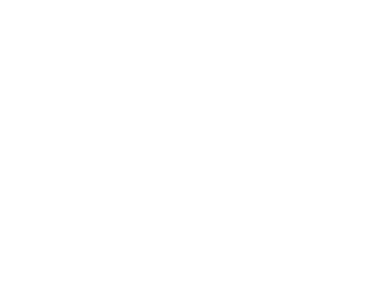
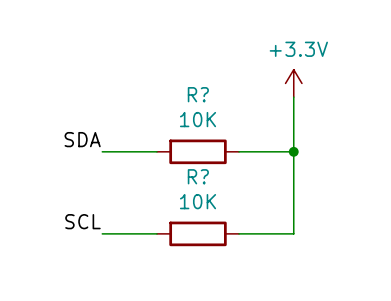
power symbol: none -> +3.3V (293, 83)
wire: none -> (293, 97) (293, 233) (239, 233)
label: none -> SDA (82, 139)
wire: none -> (102, 151) (156, 151)
R?: none -> 10K (198, 151)
wire: none -> (239, 151) (293, 151)
junction: none -> (293, 151)
label: none -> SCL (82, 221)
wire: none -> (102, 233) (156, 233)
R?: none -> 10K (198, 233)

